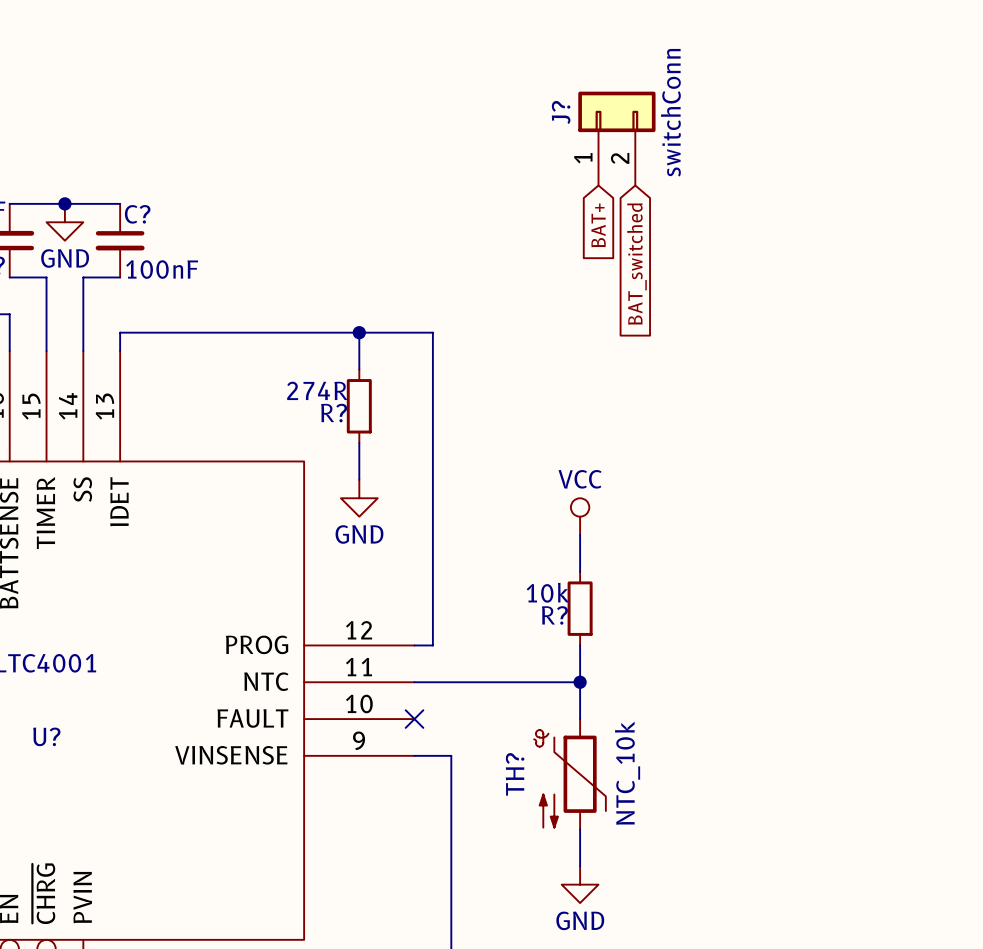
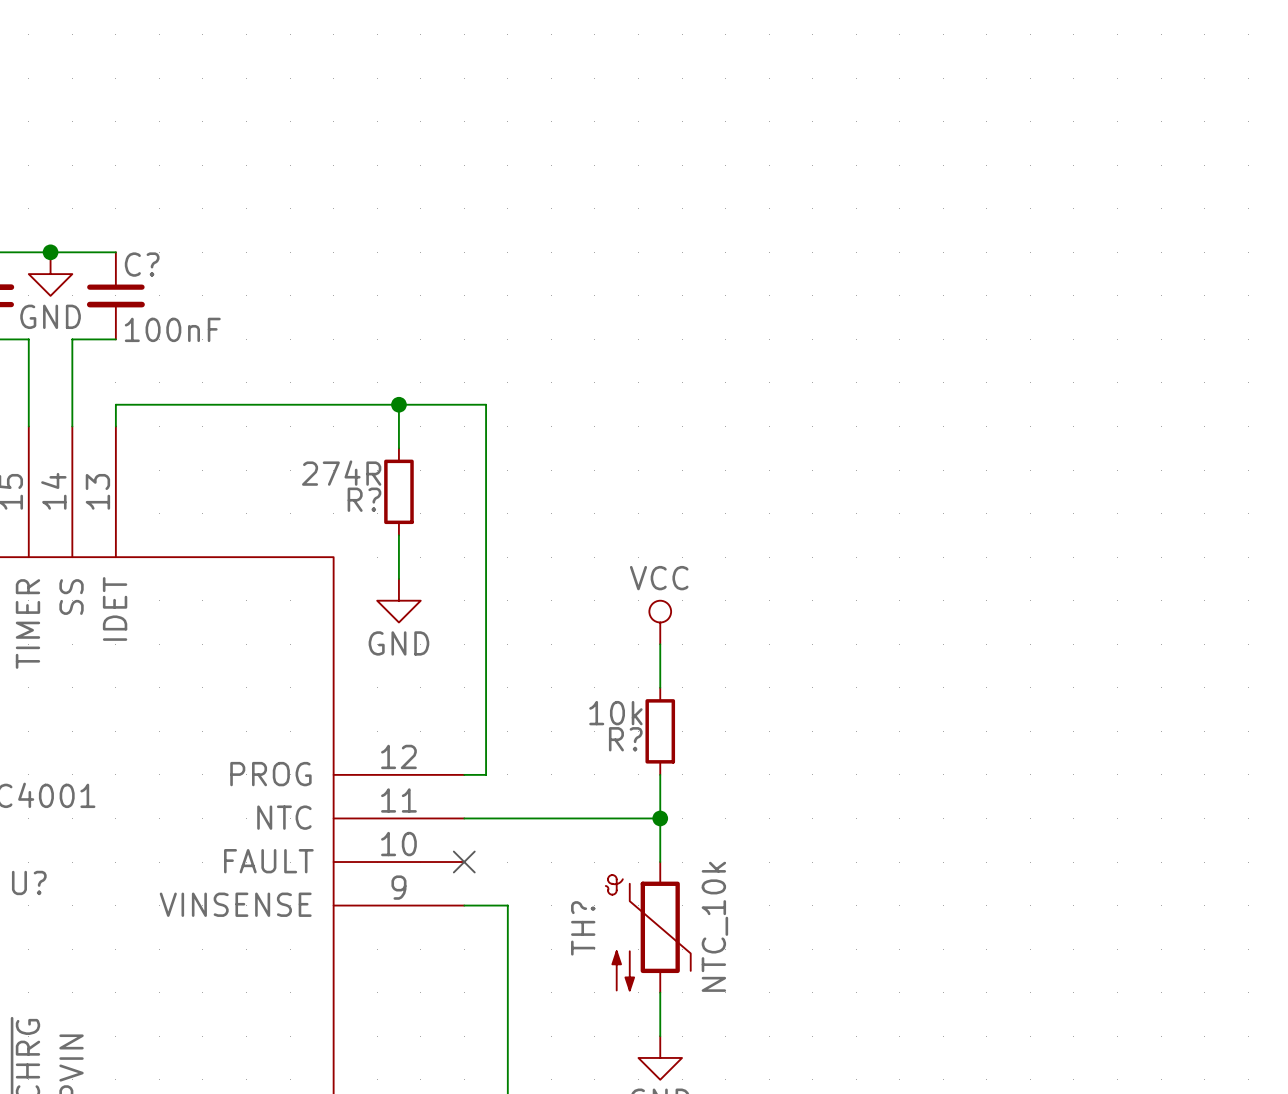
J?: switchConn (616, 138) -> none
global label: BAT+ (598, 225) -> none
global label: BAT_switched (636, 264) -> none

